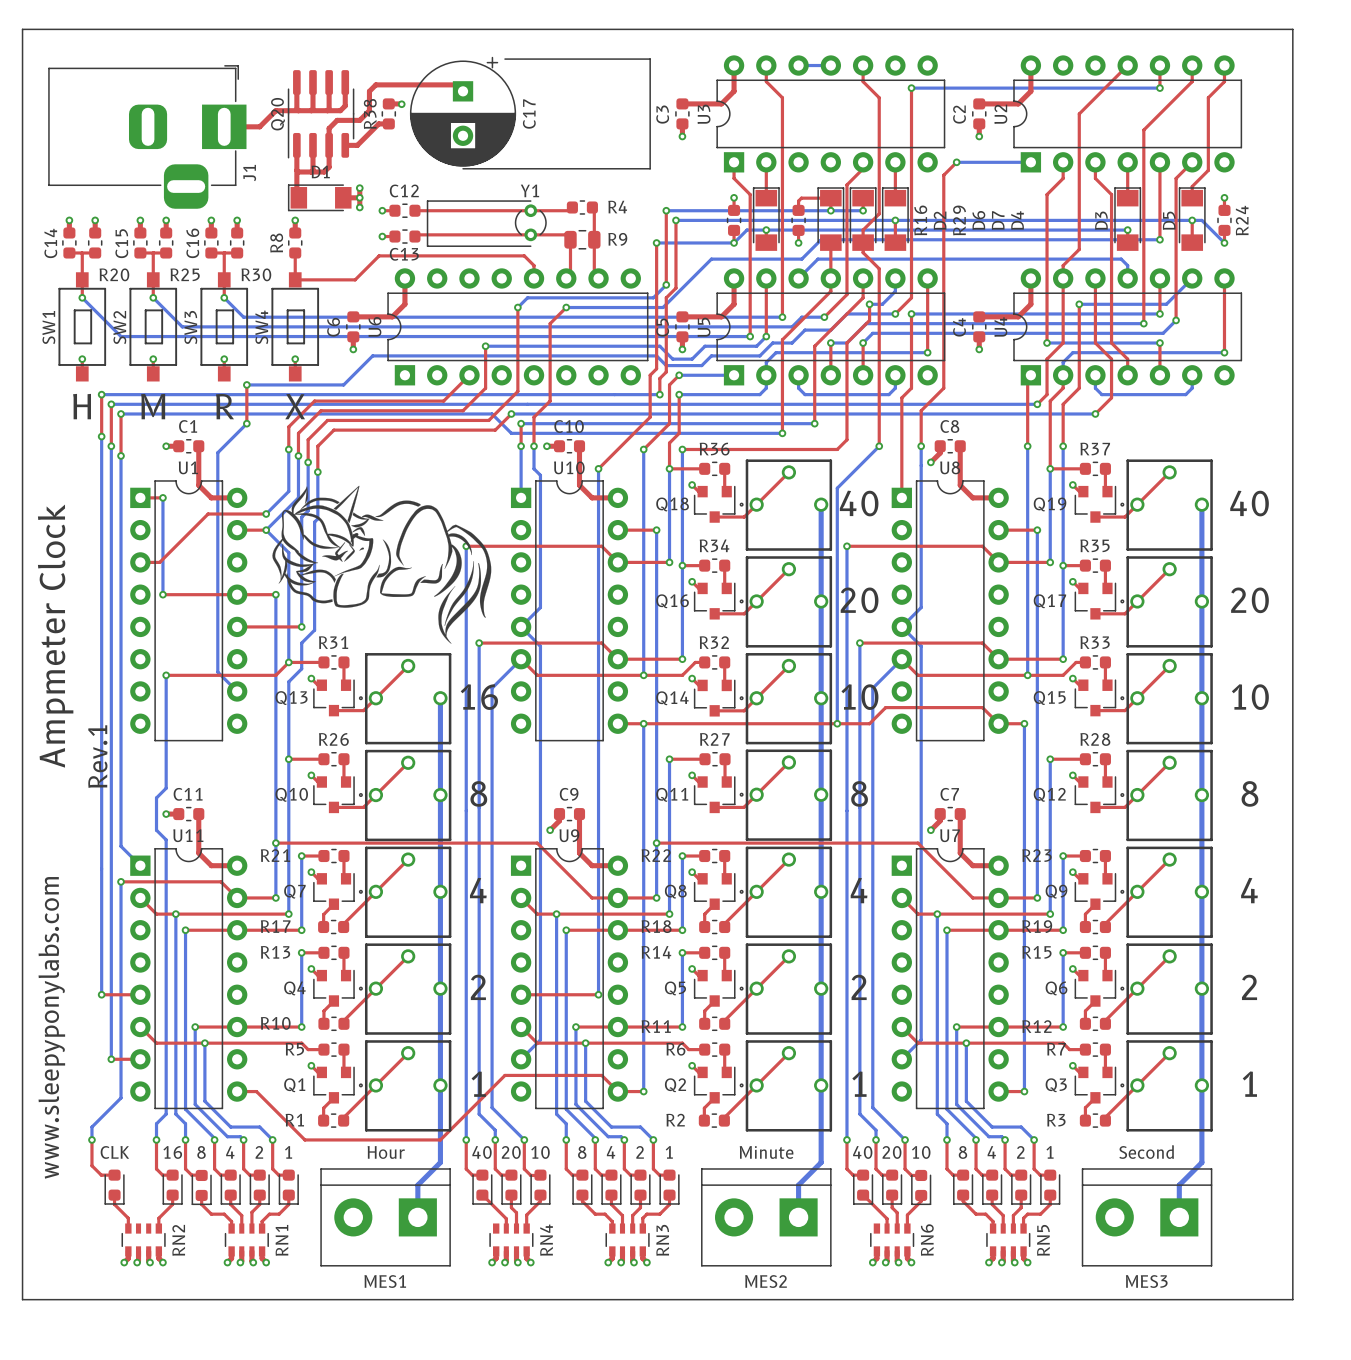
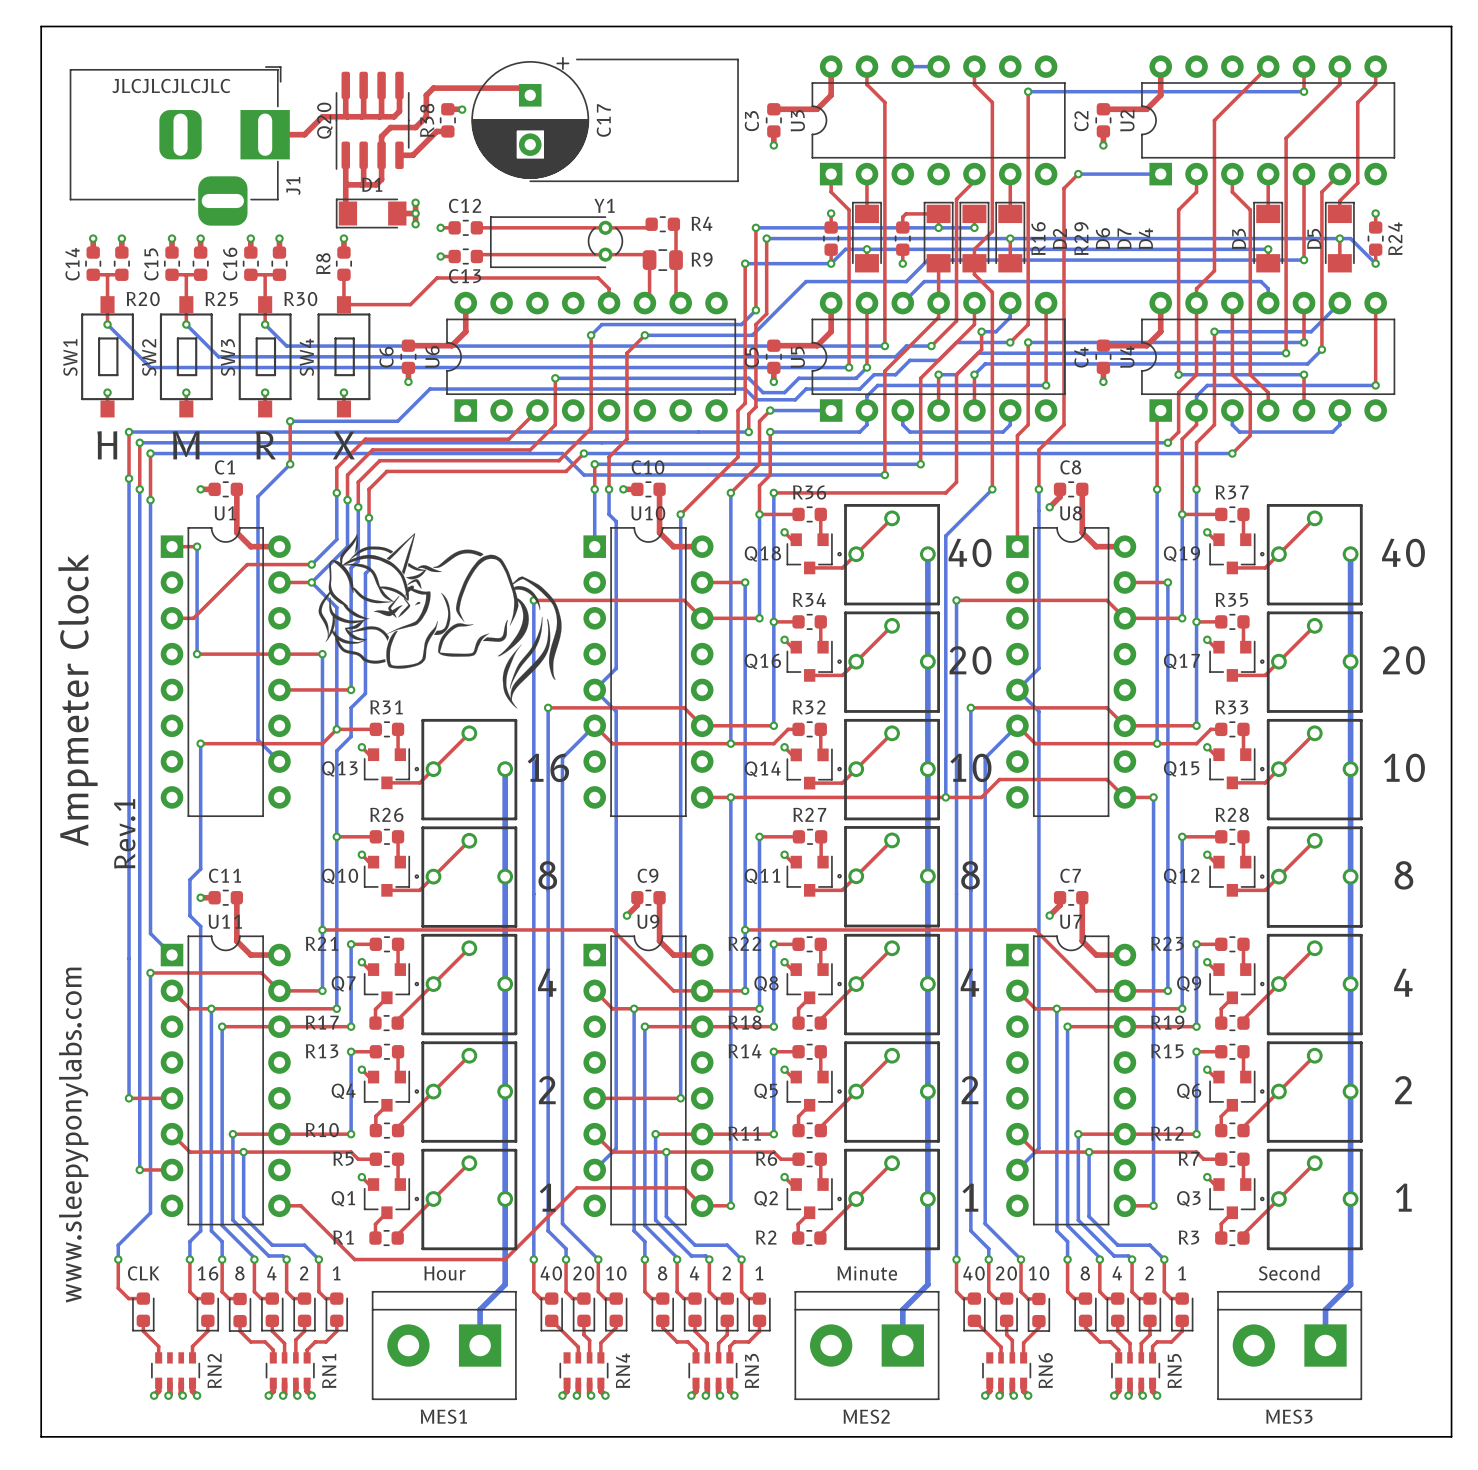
line: (22, 29) (22, 1299) (1292, 1299) (1292, 29) (22, 29) -> none
board edge: none -> (41, 26) (41, 1436) (1451, 1436) (1451, 26) (41, 26)
text: none -> JLCJLCJLCJLC (171, 85)

